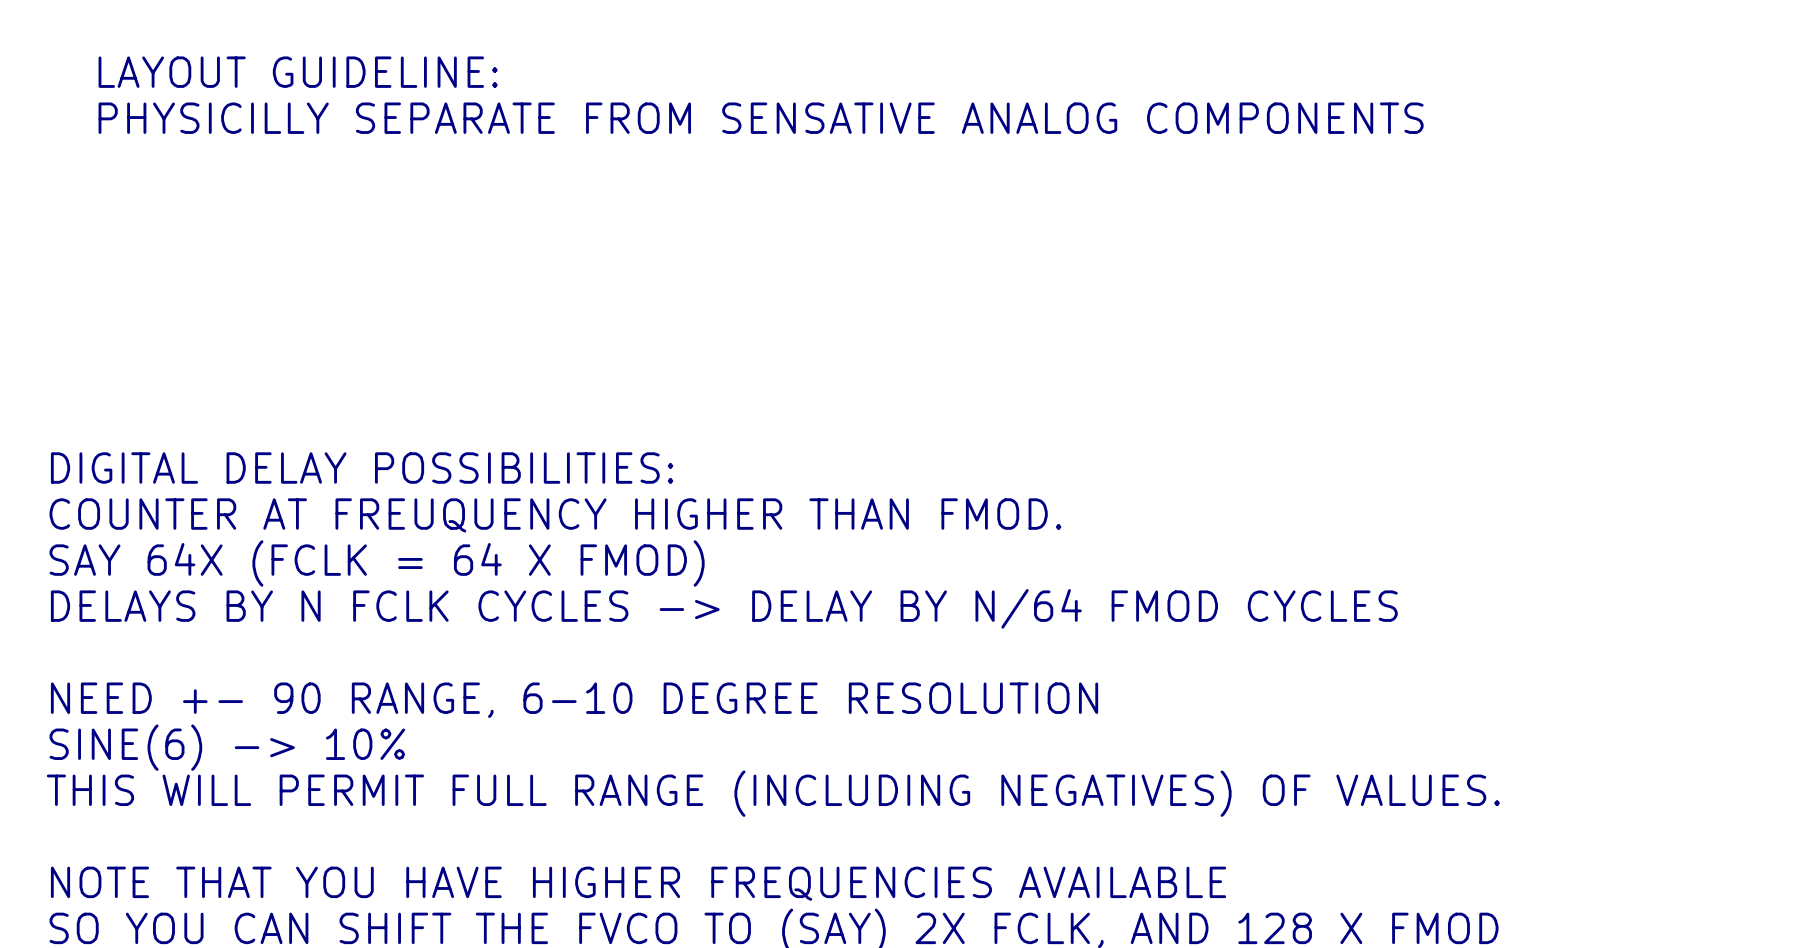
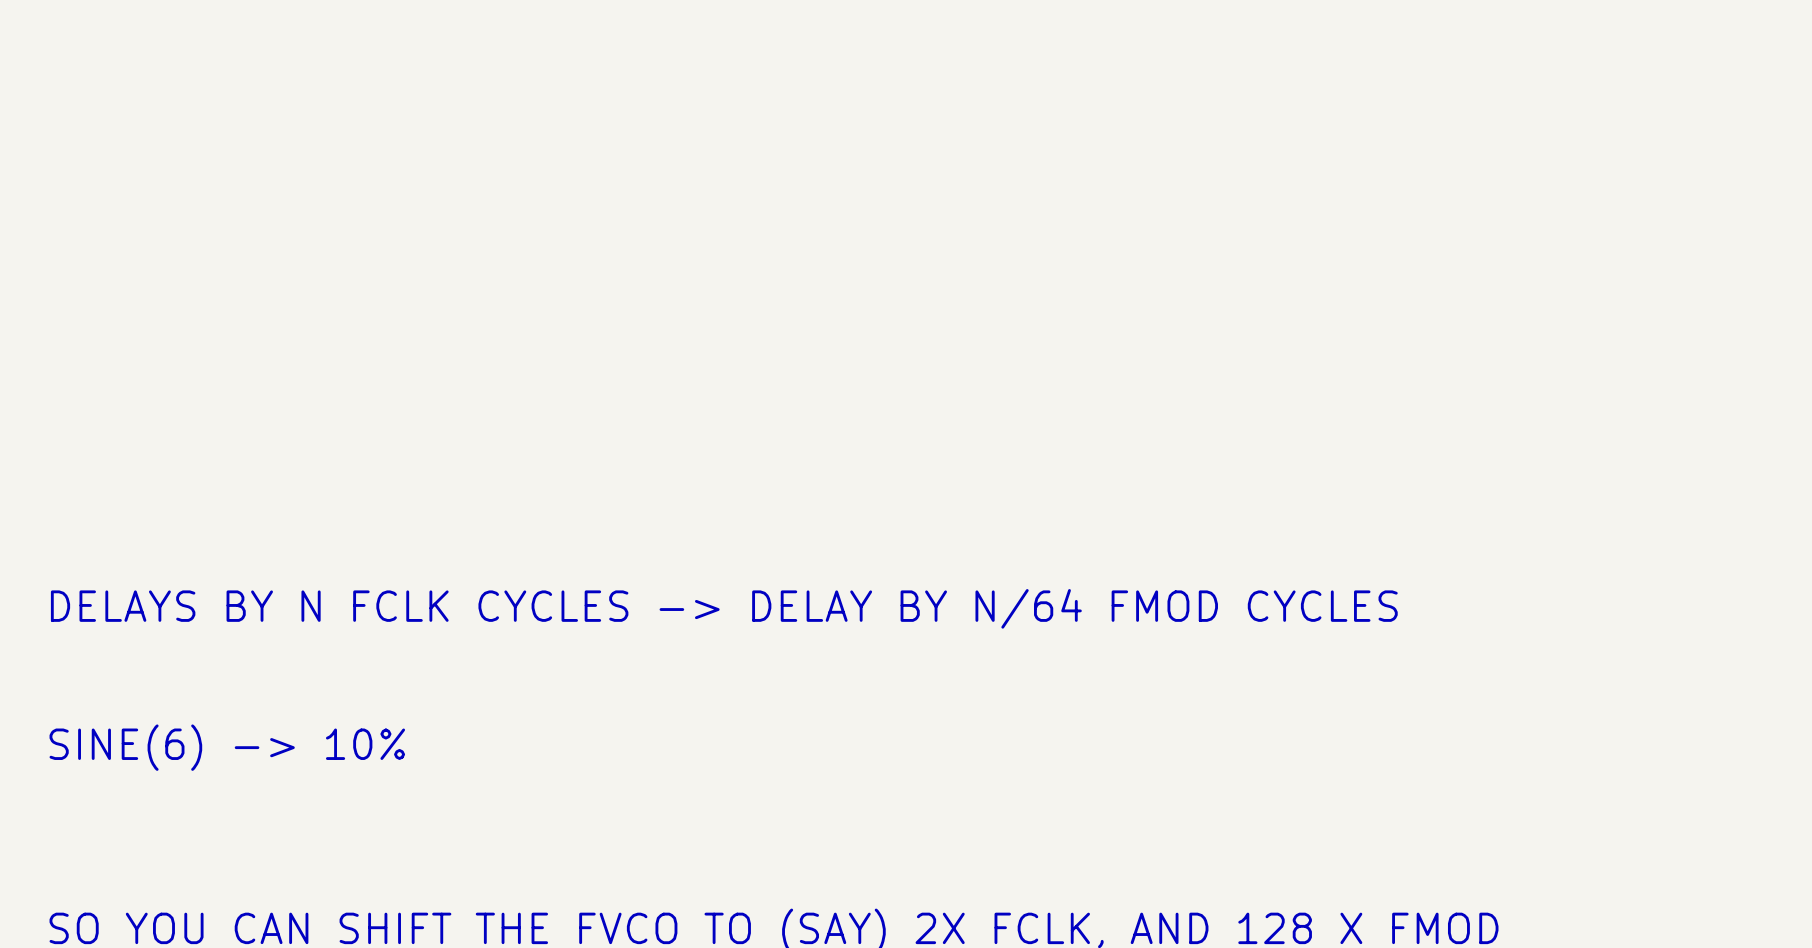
text: LAYOUT GUIDELINE: (298, 72) -> none
text: PHYSICILLY SEPARATE FROM SENSATIVE ANALOG COMPONENTS (761, 118) -> none
text: DIGITAL DELAY POSSIBILITIES: (362, 468) -> none
text: COUNTER AT FREUQUENCY HIGHER THAN FMOD. (555, 515) -> none
text: SAY 64X (FCLK = 64 X FMOD) (377, 563) -> none
text: NEED +- 90 RANGE, 6-10 DEGREE RESOLUTION (574, 700) -> none
text: THIS WILL PERMIT FULL RANGE (INCLUDING NEGATIVES) OF VALUES. (773, 793) -> none
text: NOTE THAT YOU HAVE HIGHER FREQUENCIES AVAILABLE (638, 883) -> none

